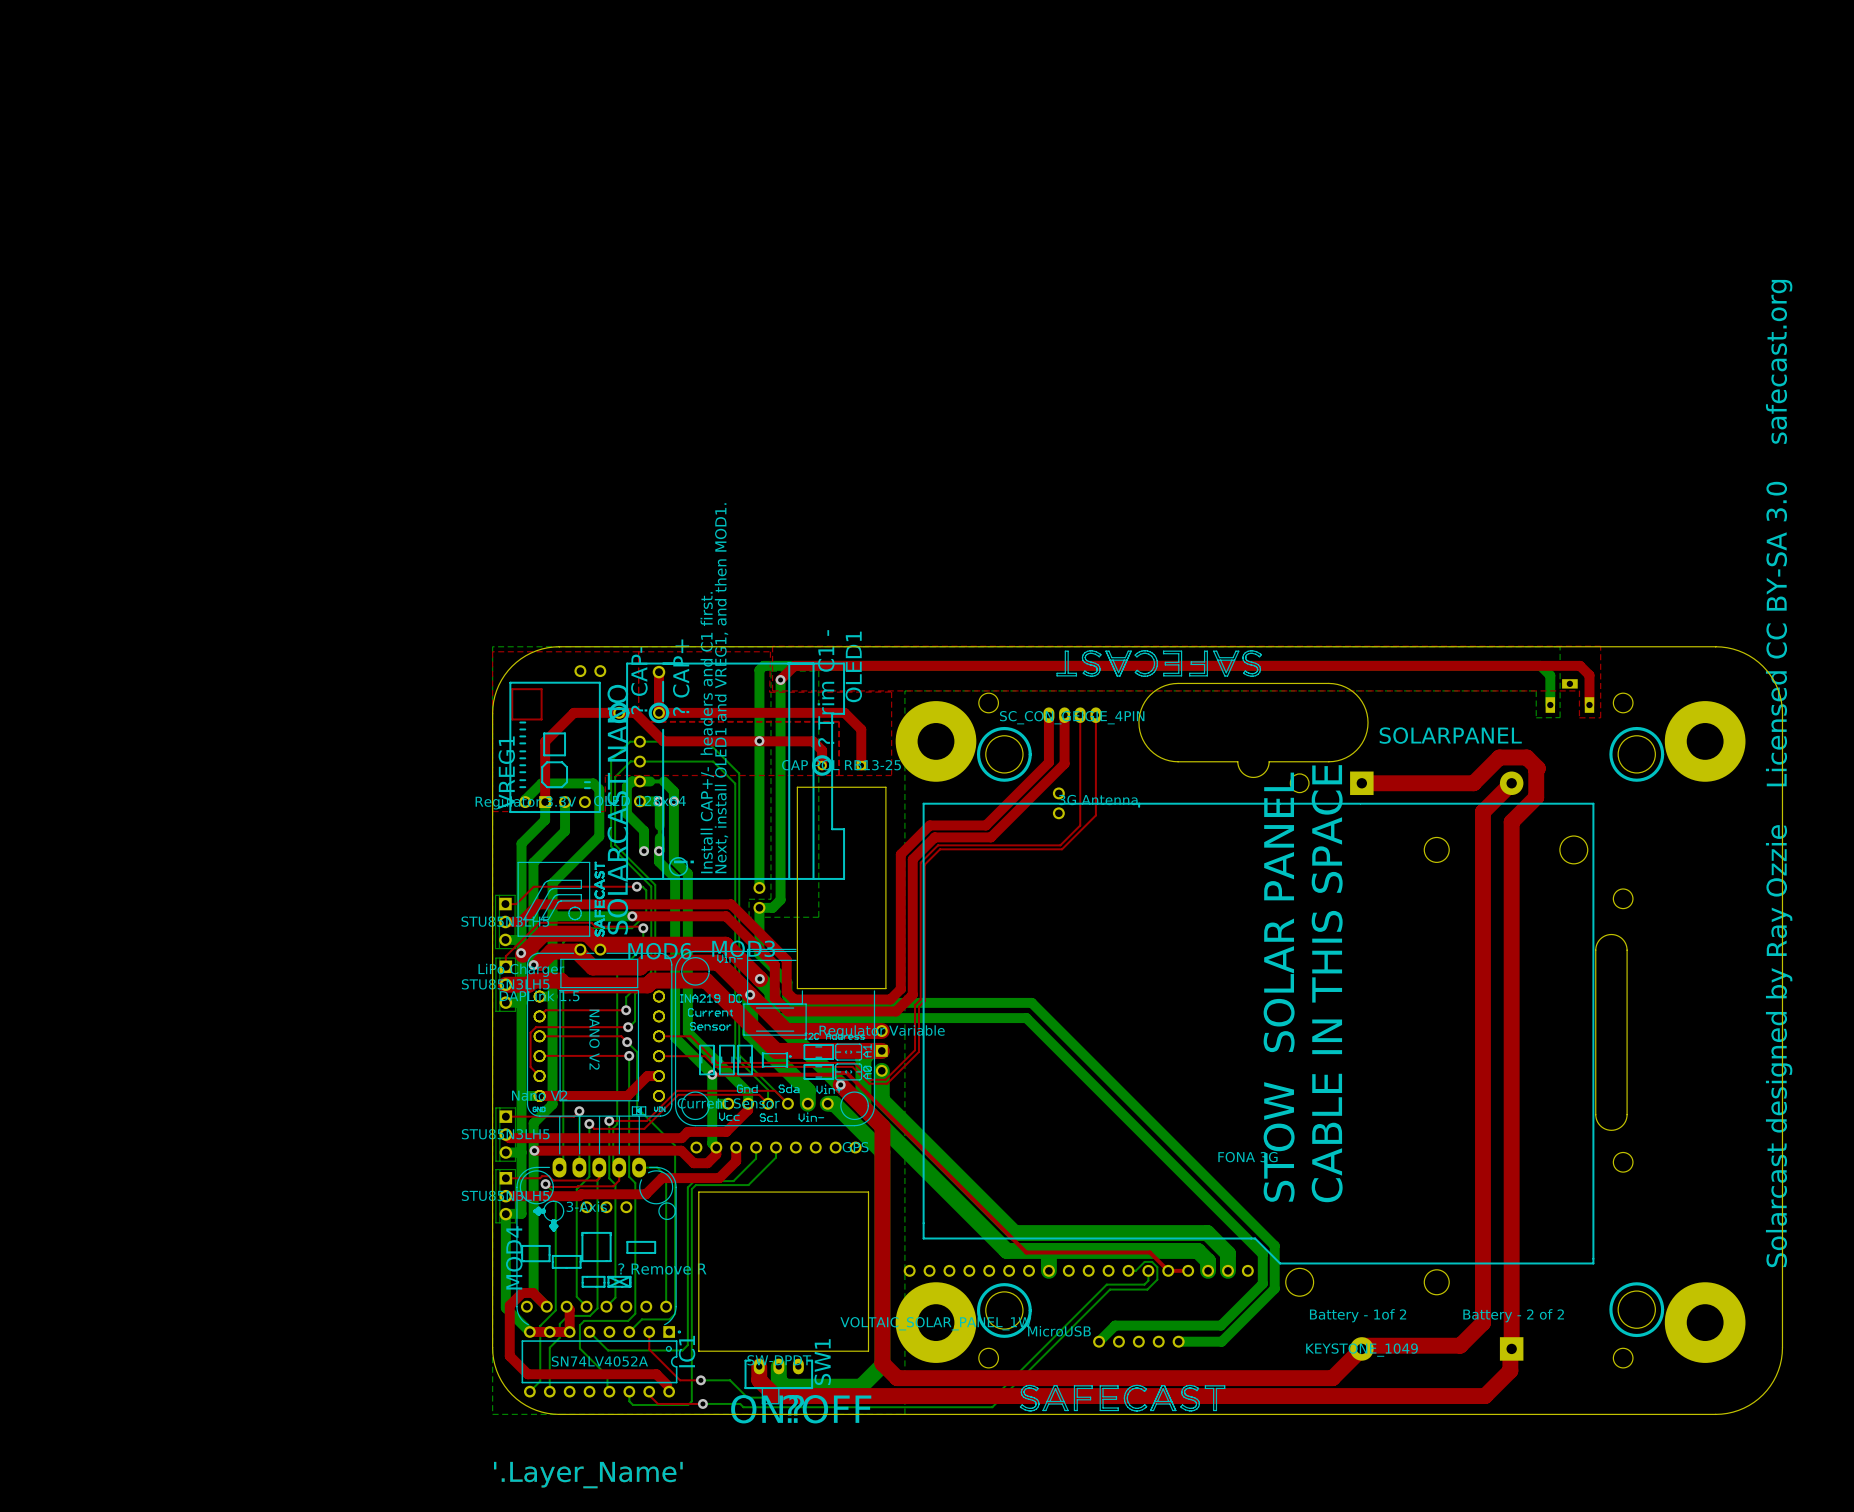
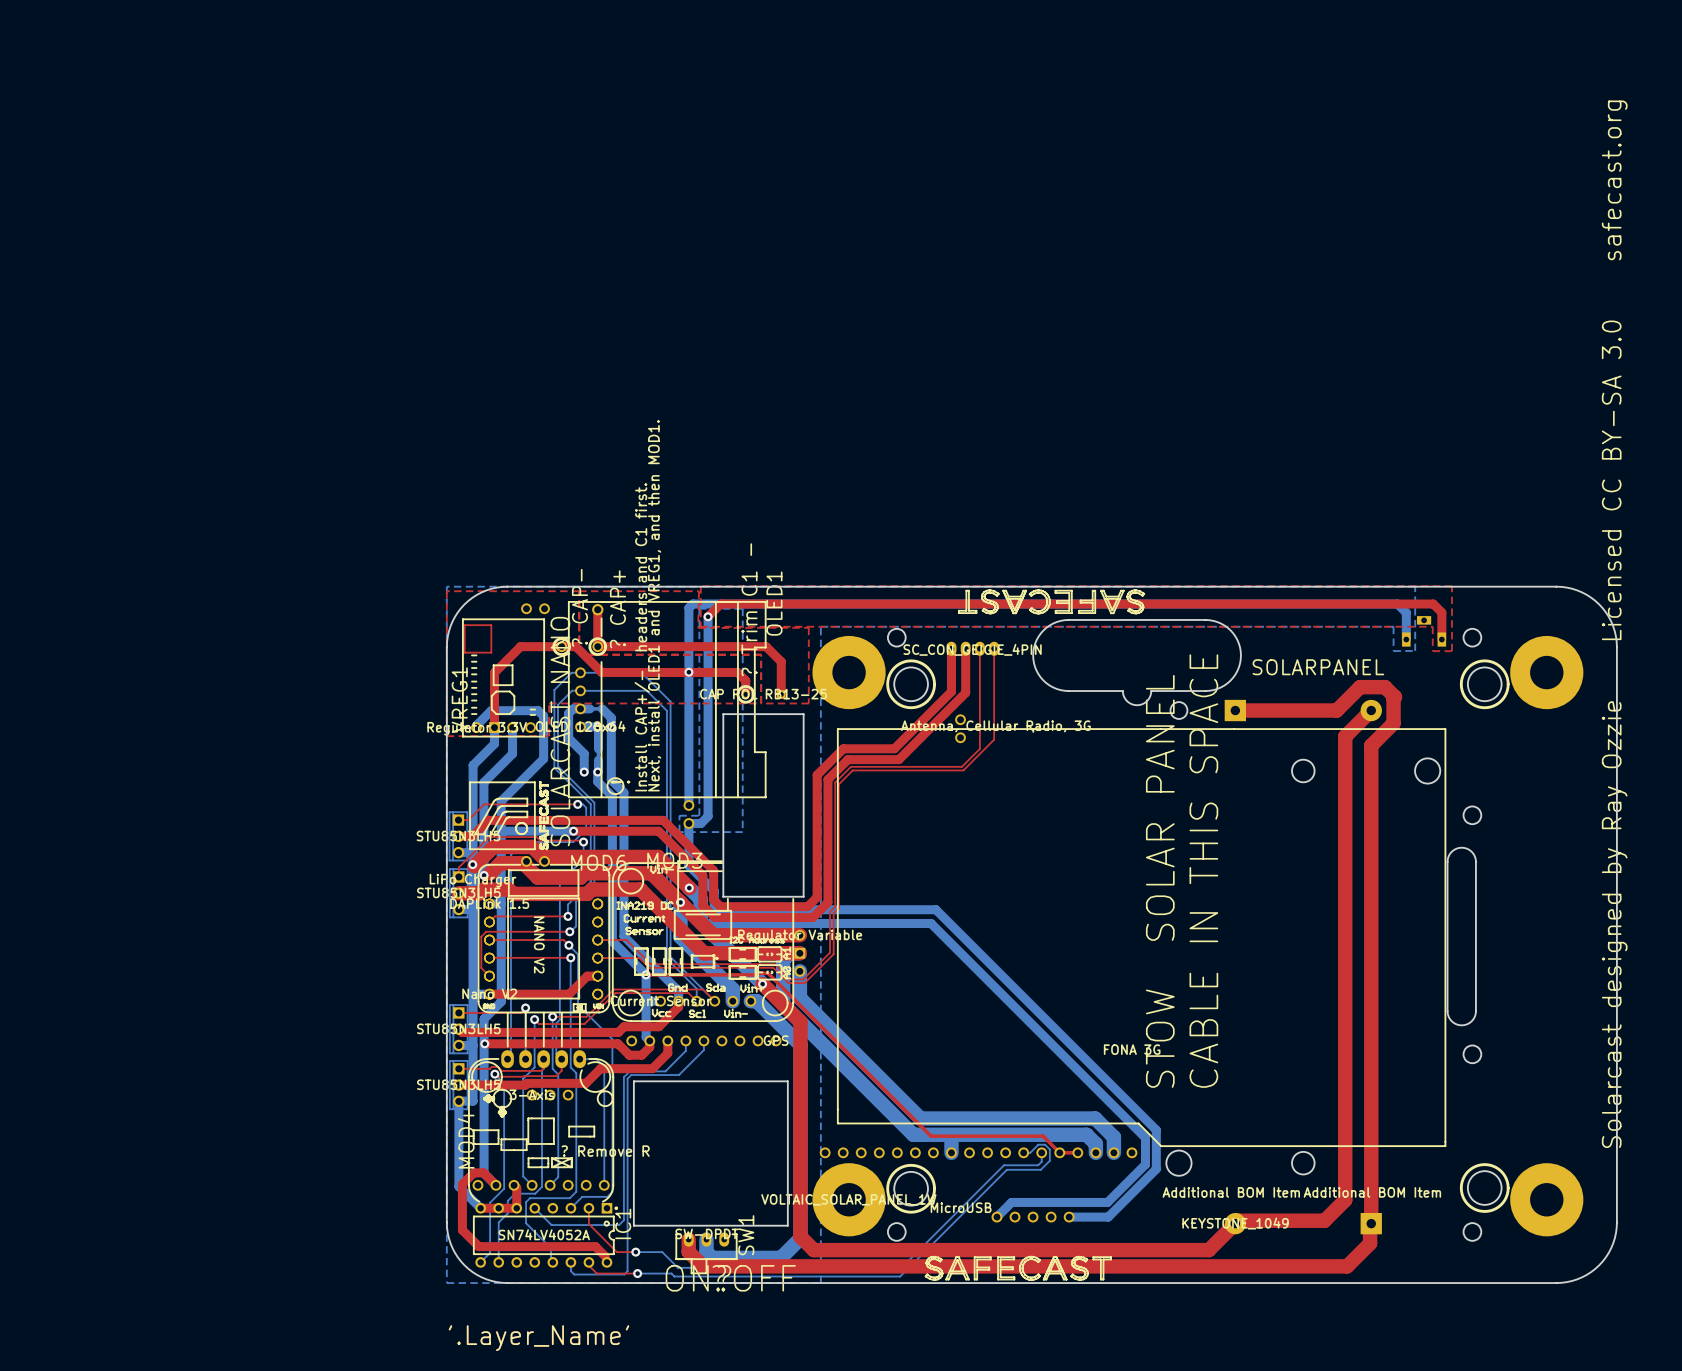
drawing shape: [1058, 794, 1138, 806] -> [901, 721, 1091, 732]
drawing shape: [1309, 1309, 1407, 1323] -> [1163, 1187, 1300, 1198]
drawing shape: [1463, 1309, 1564, 1323] -> [1304, 1187, 1441, 1198]

